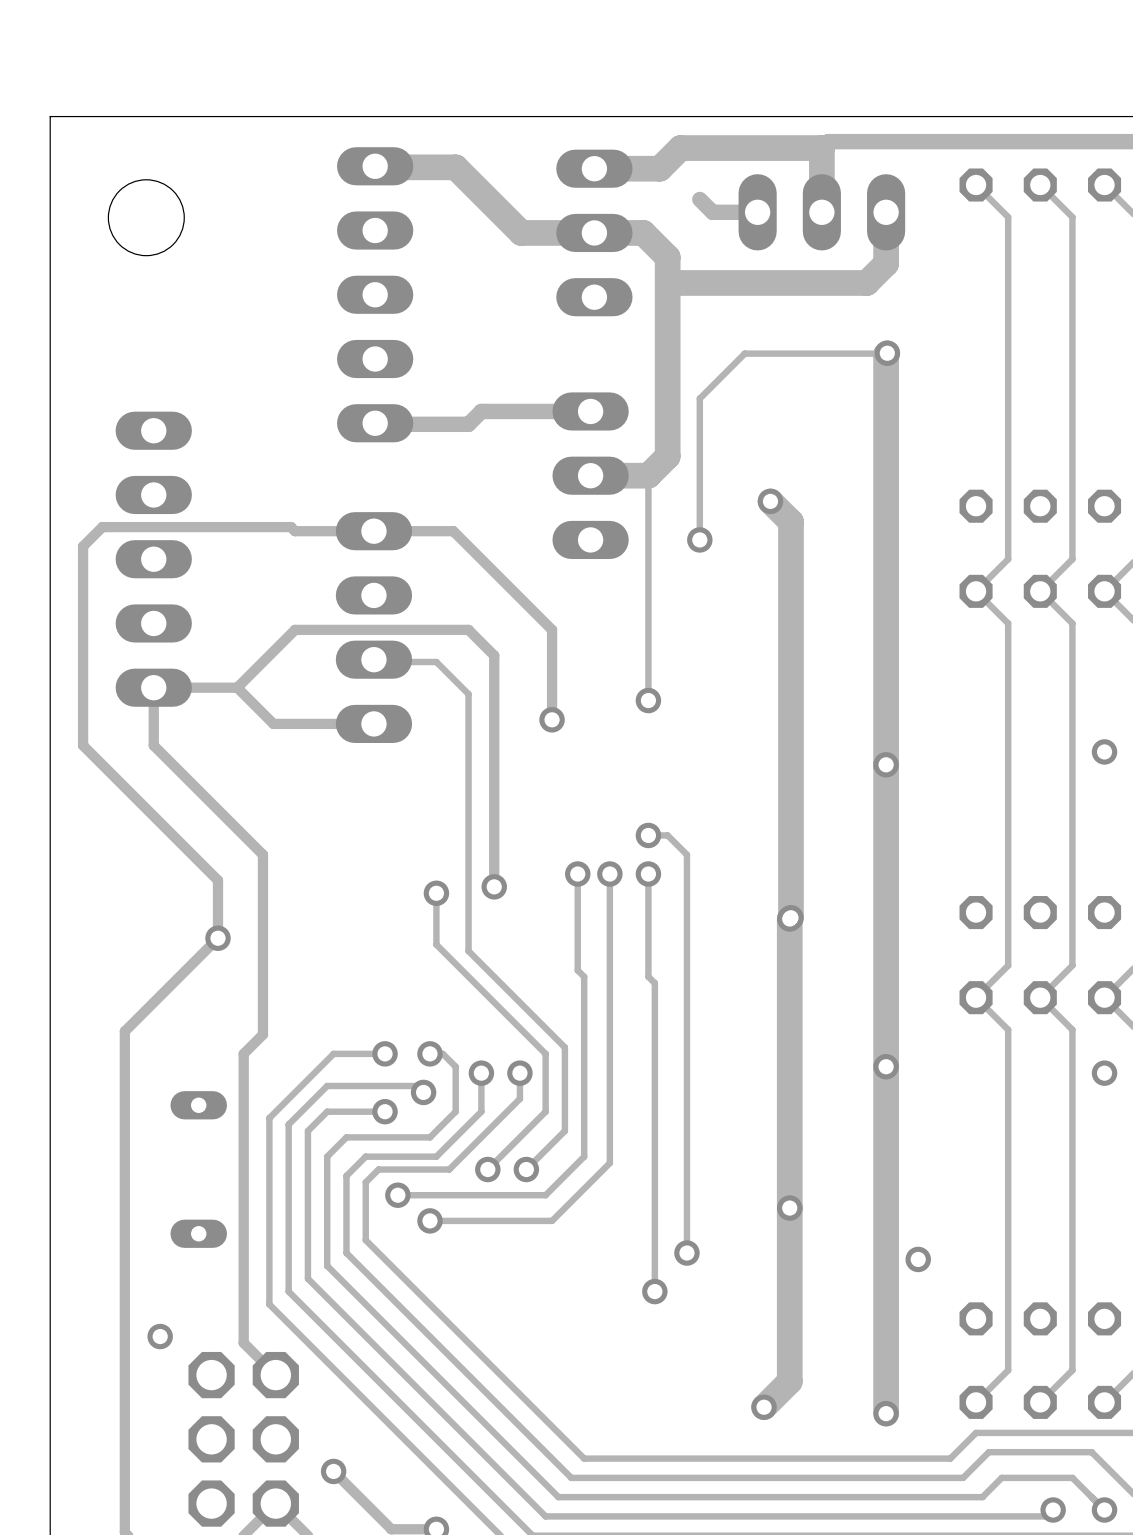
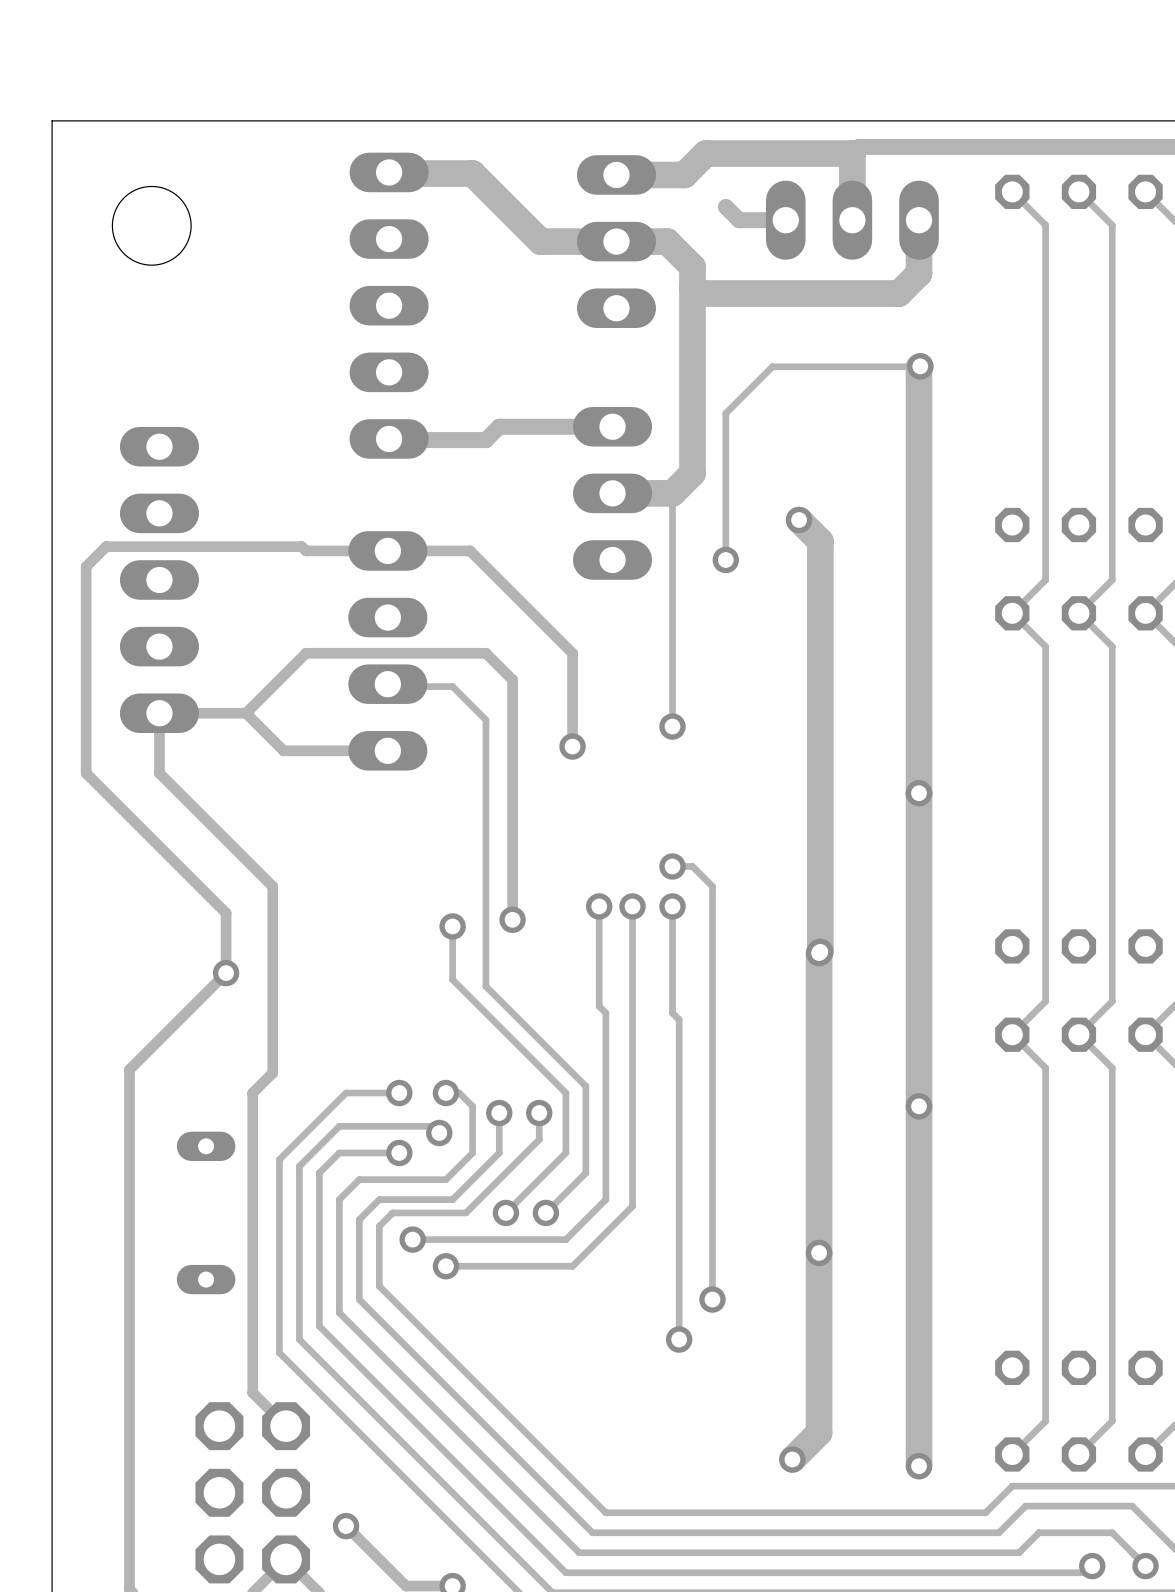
via: (1104, 751) -> none
via: (1104, 1073) -> none
via: (918, 1259) -> none
via: (160, 1336) -> none

